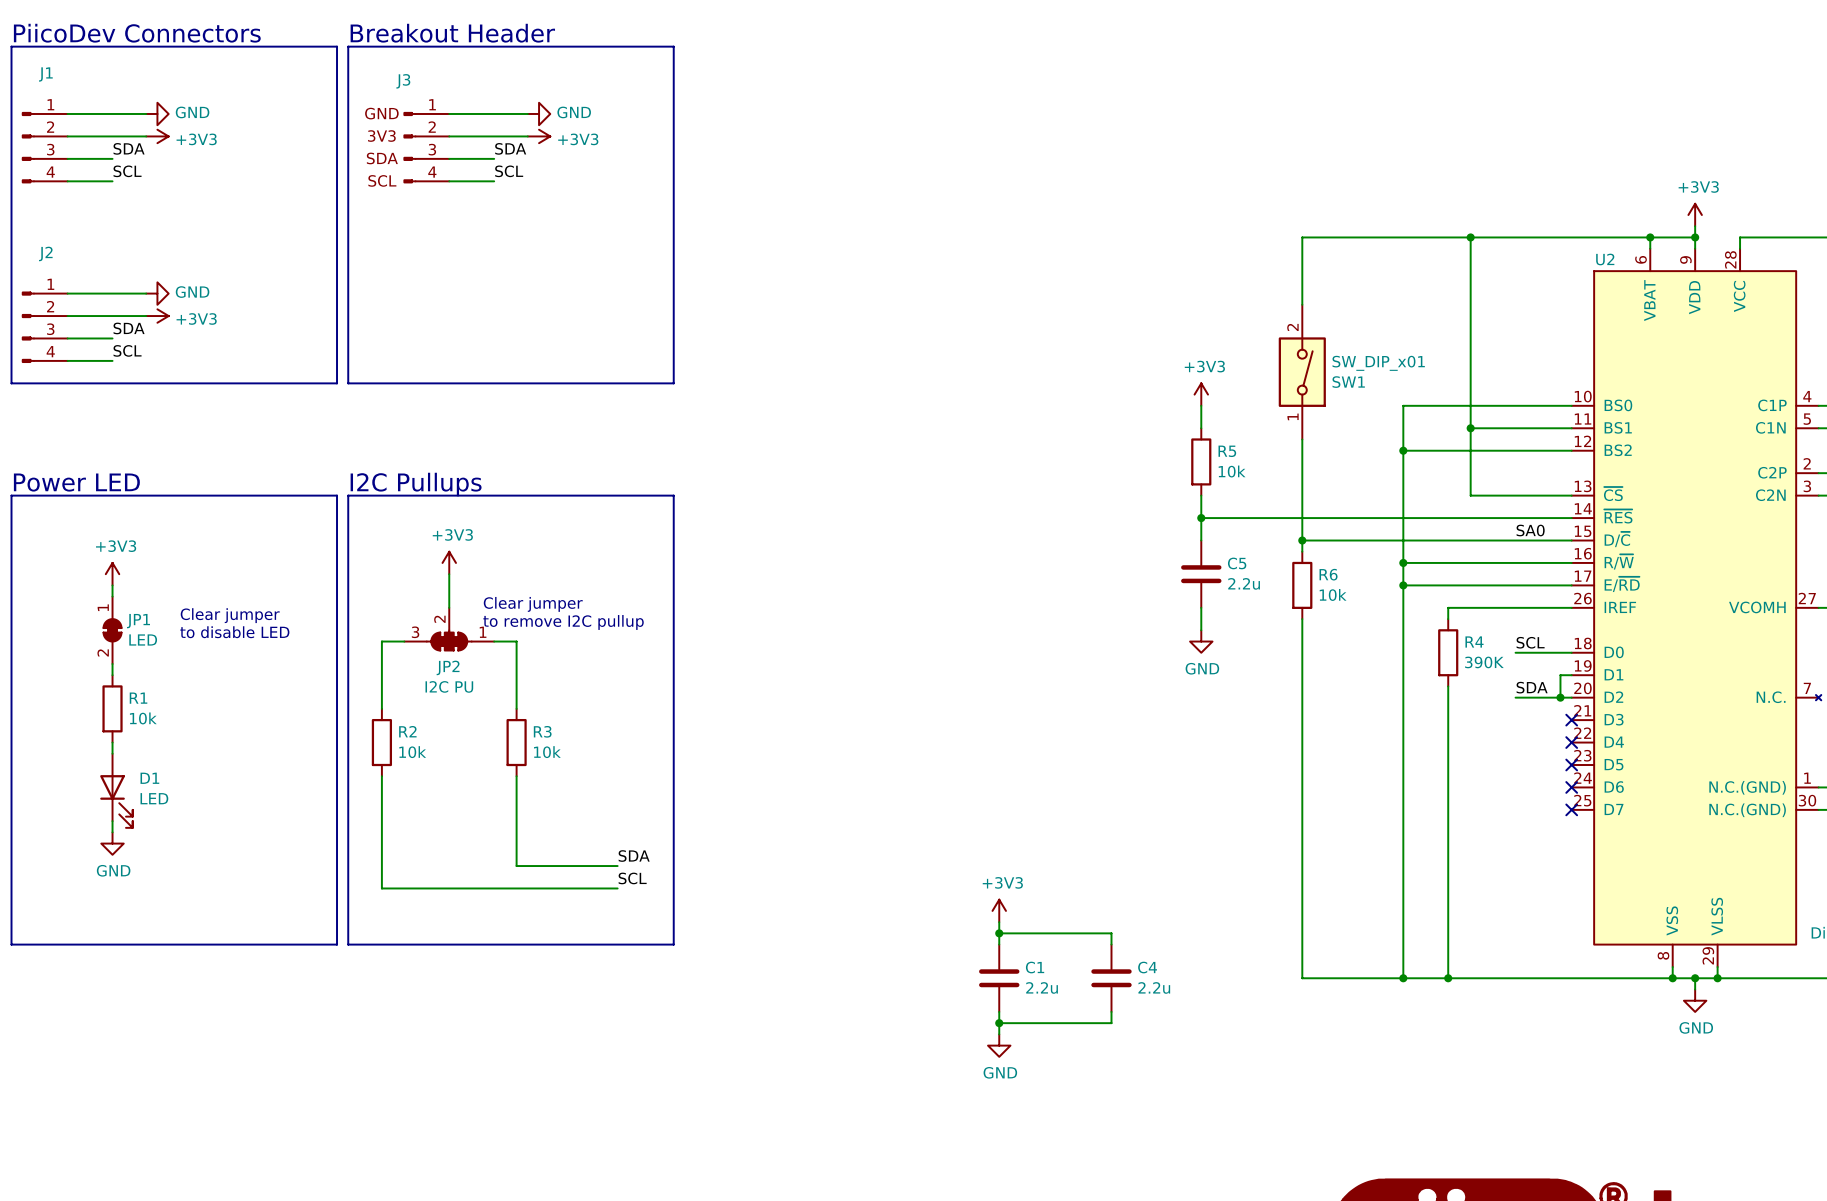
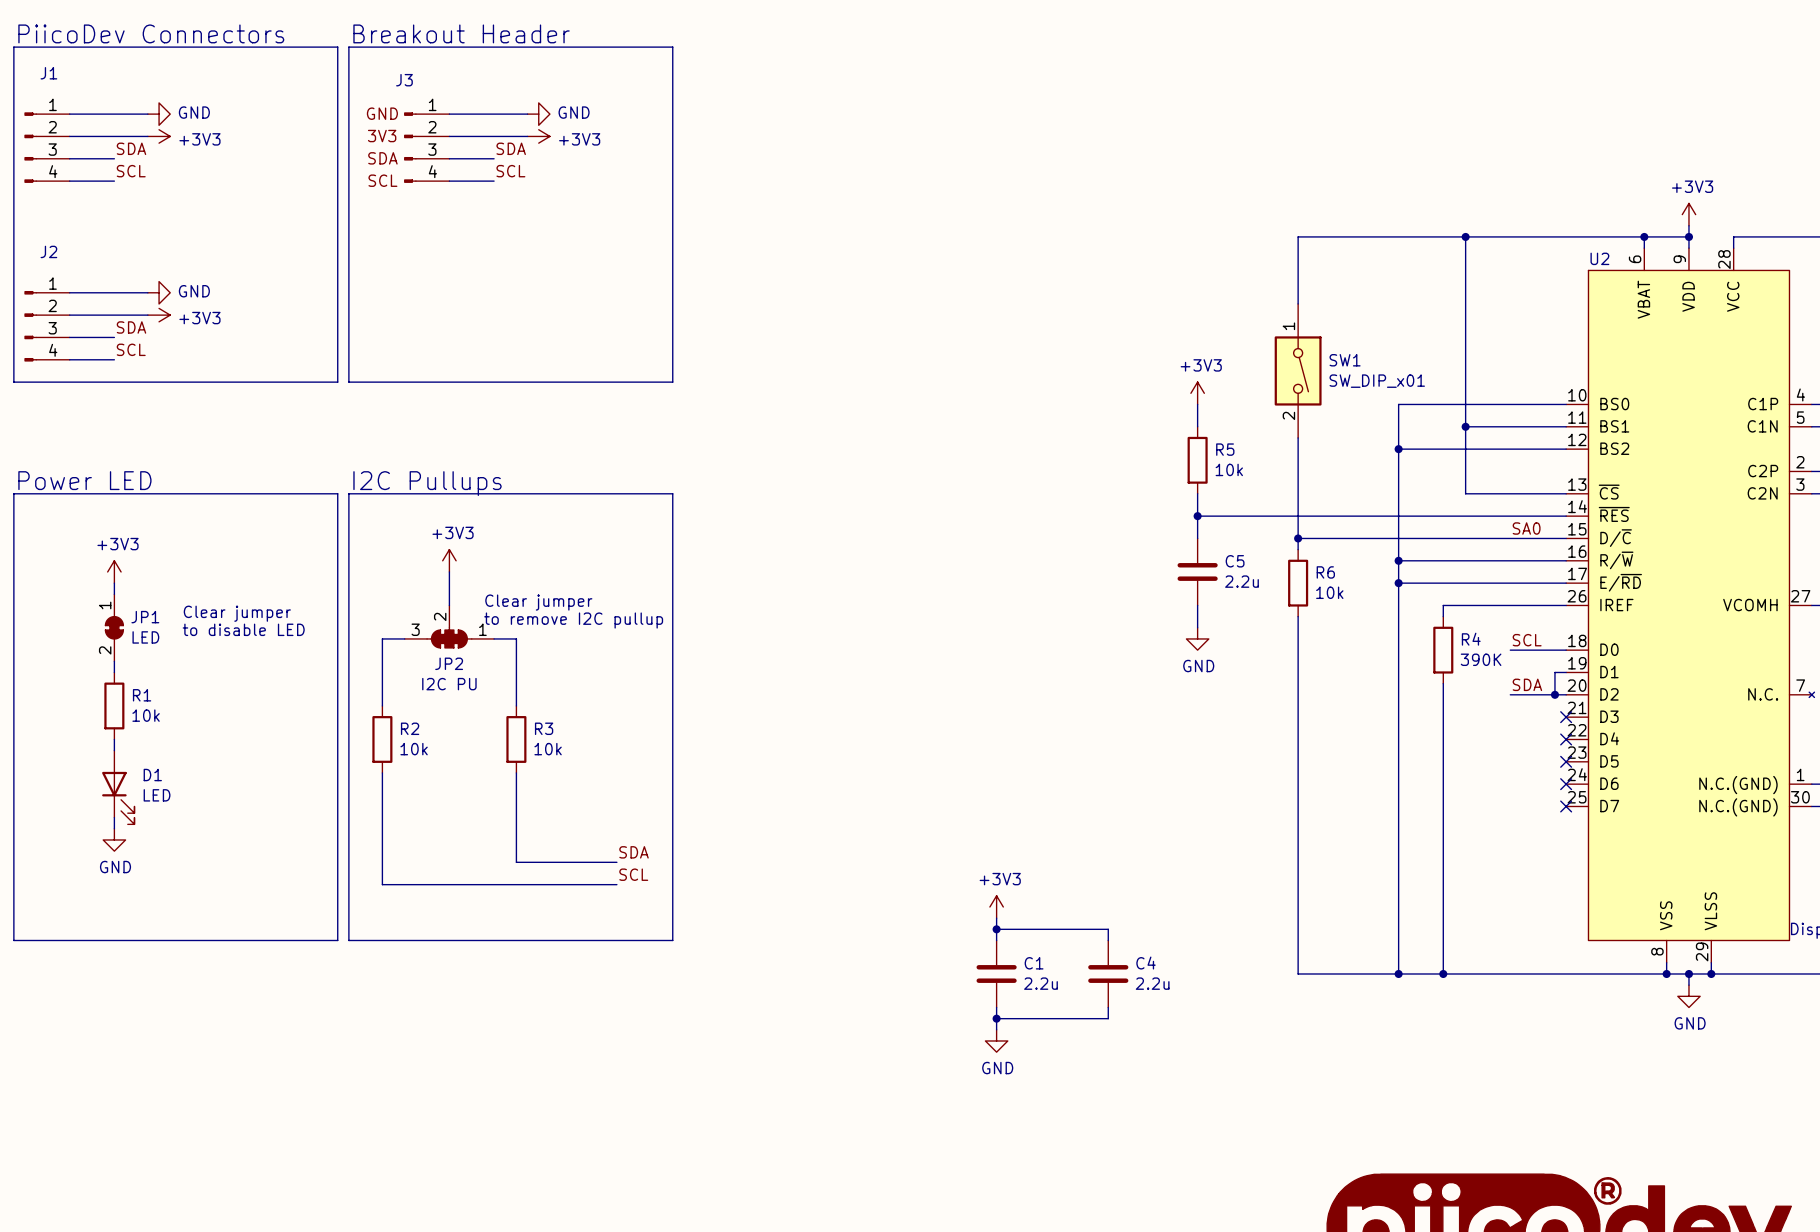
SW1 flip: as is (1302, 372) -> up-down (1298, 370)

